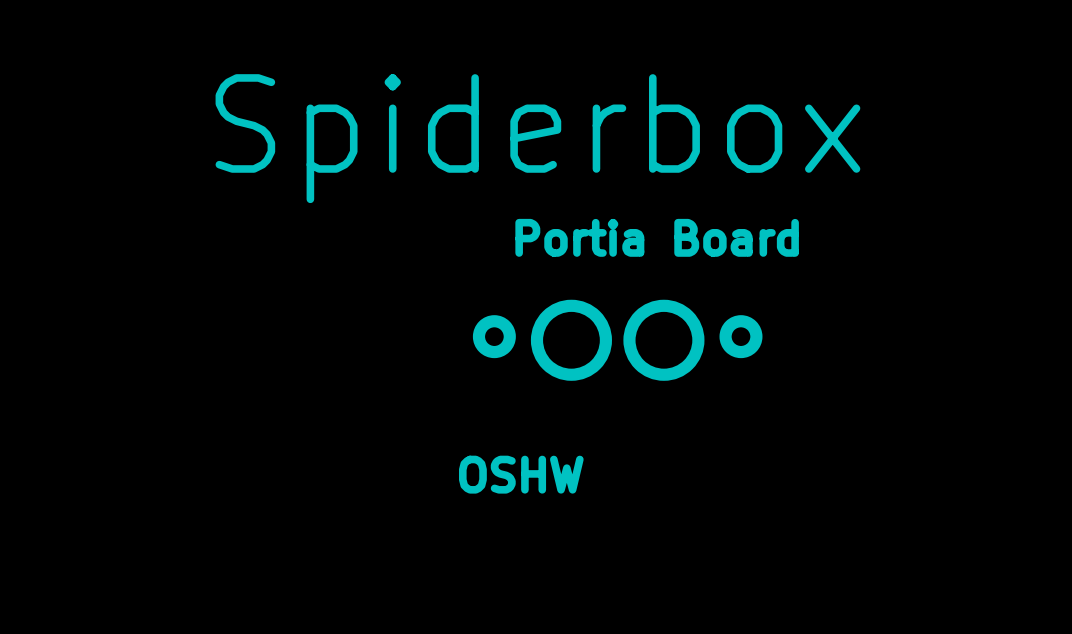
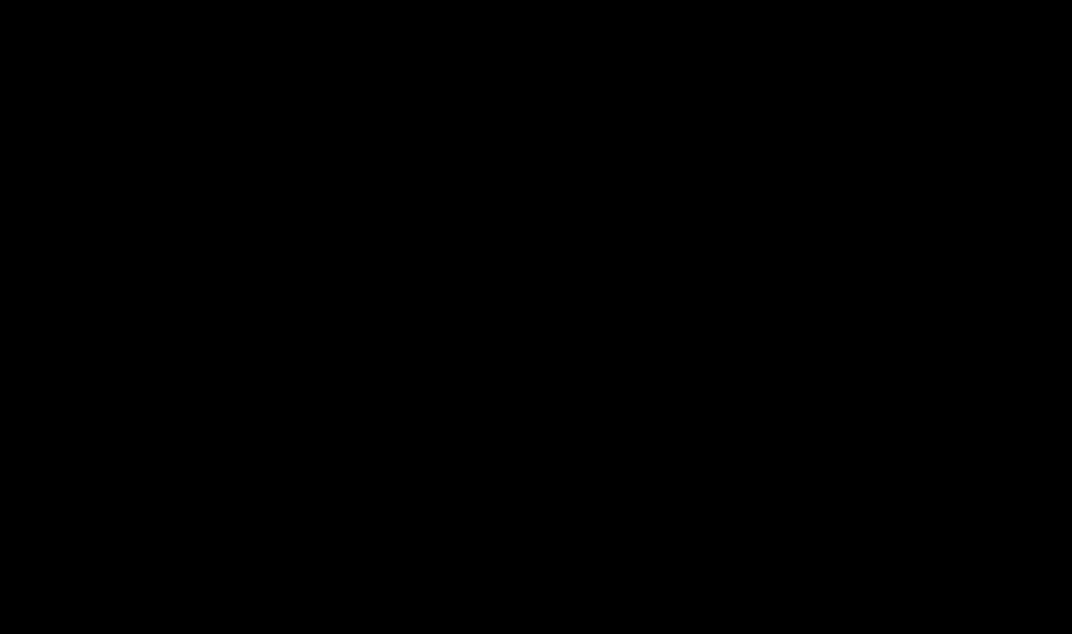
text: Spiderbox (537, 138) -> none
text: Portia Board (657, 237) -> none
drawing: [472, 299, 763, 381] -> none
text: OSHW (521, 474) -> none

